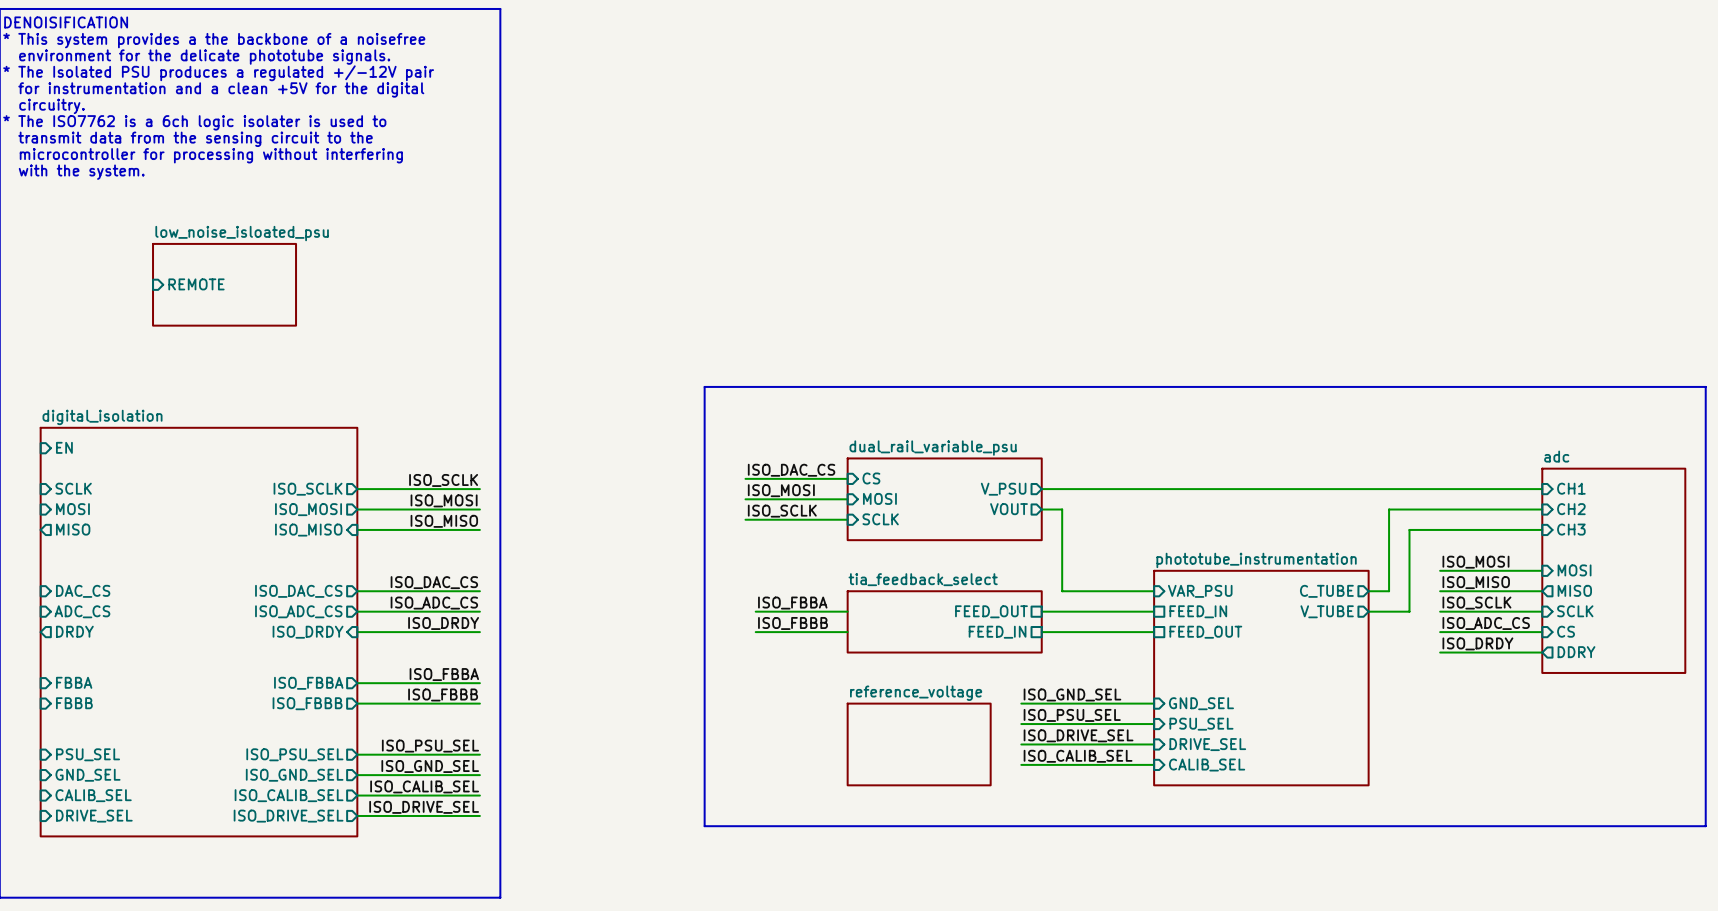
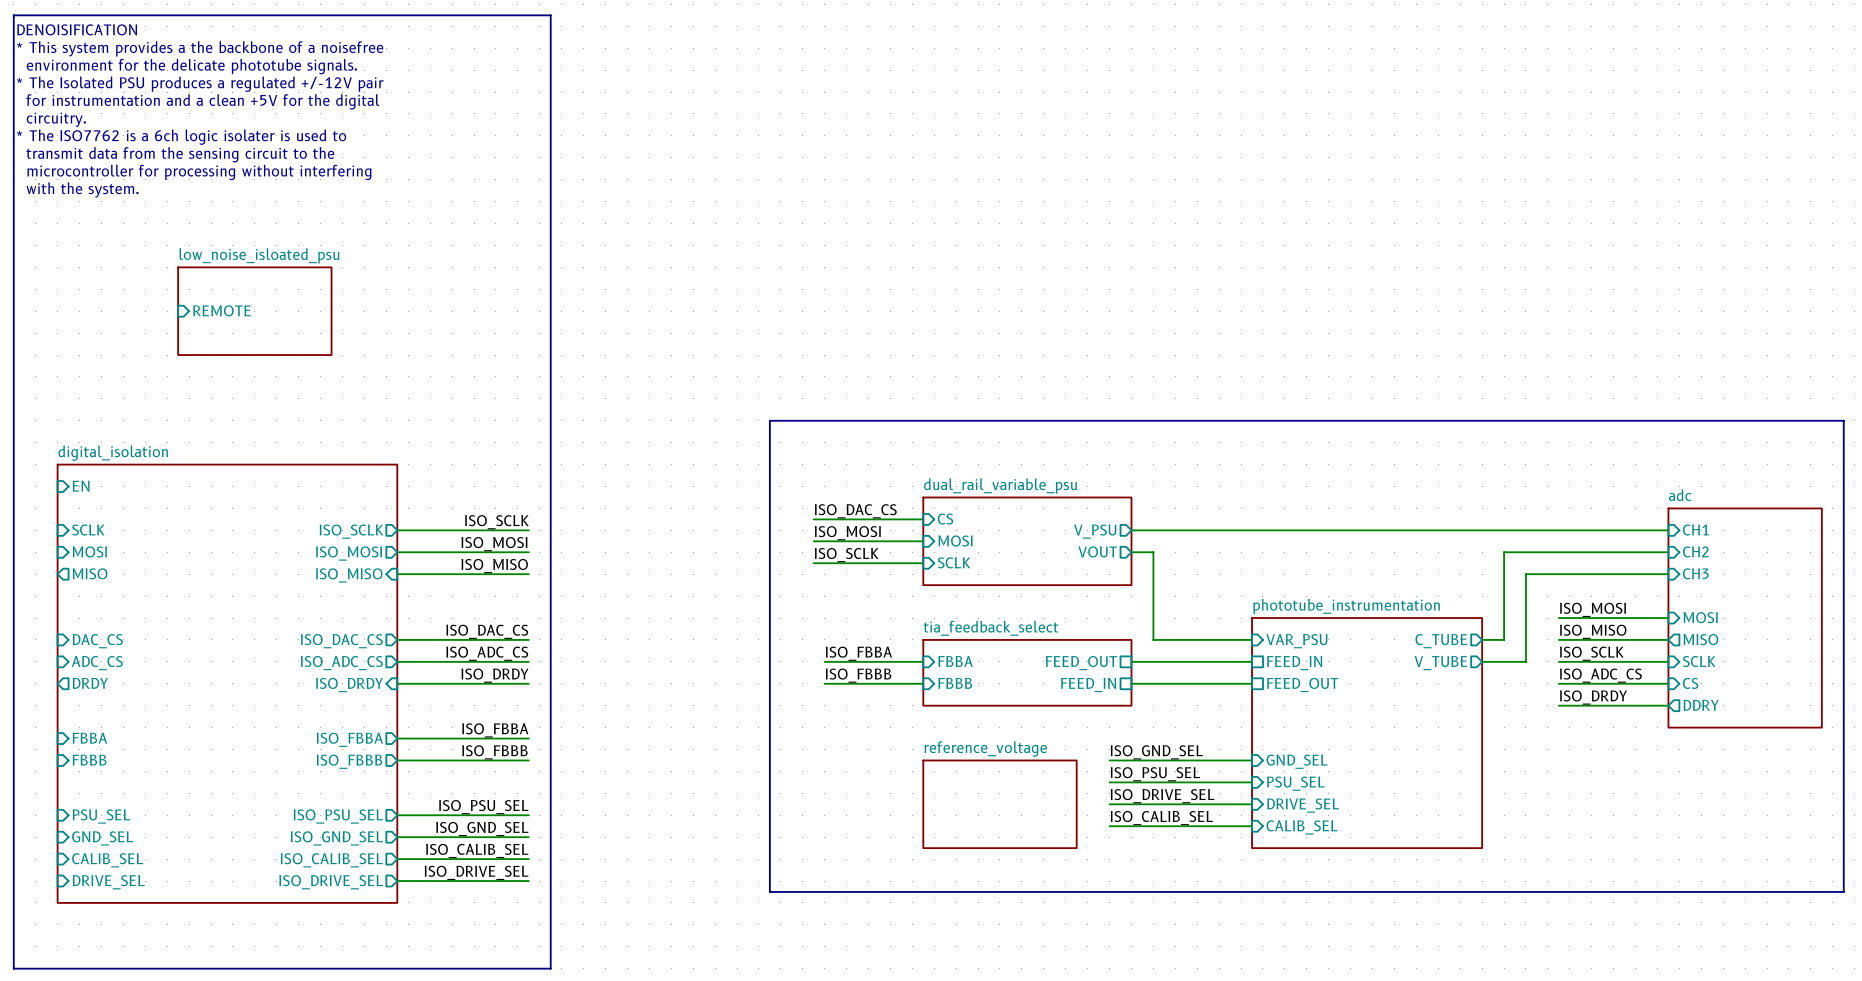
sheet pin: none -> FBBA (955, 661)
sheet pin: none -> FBBB (955, 683)

